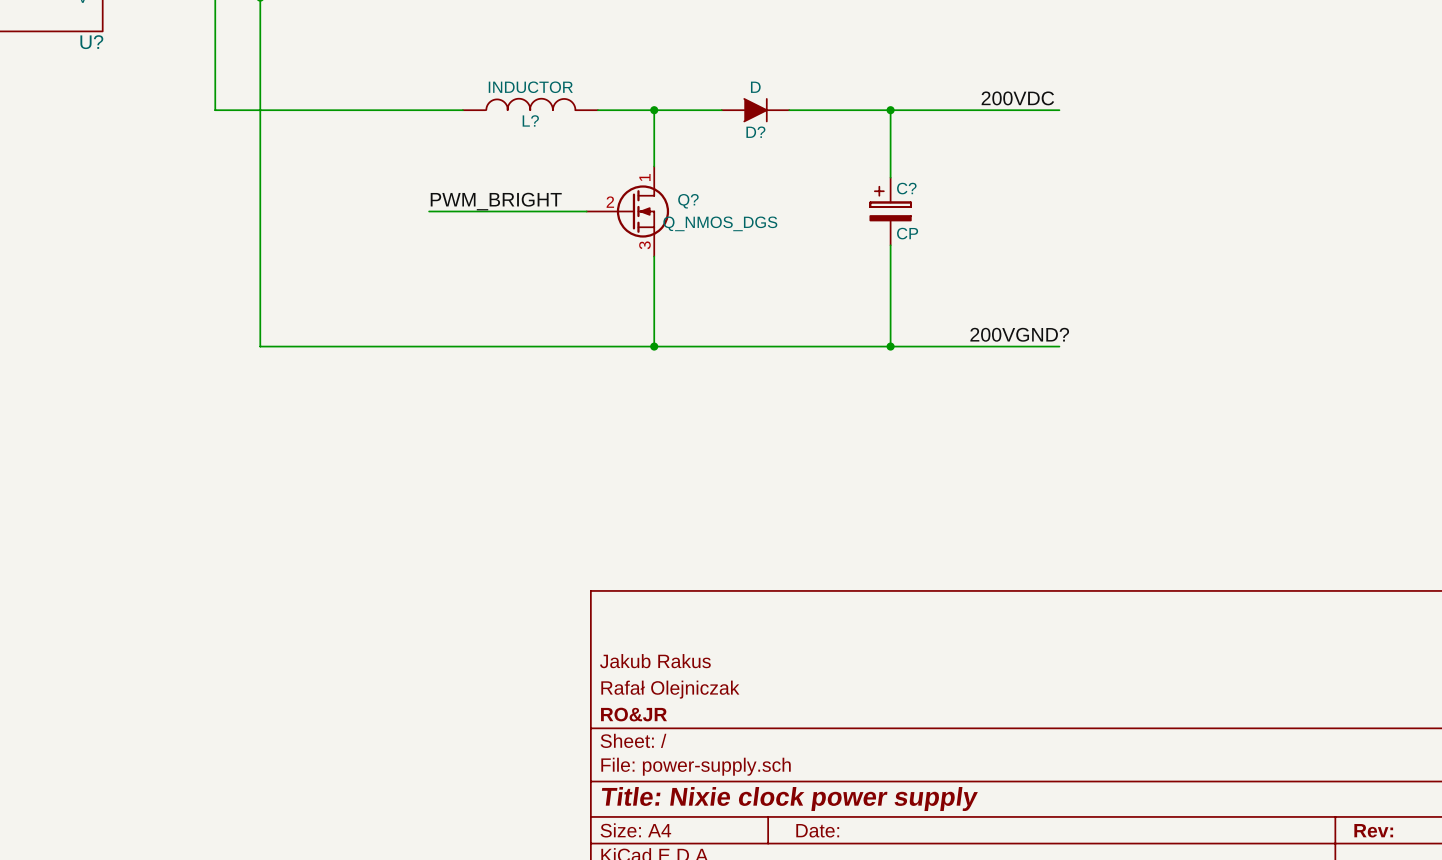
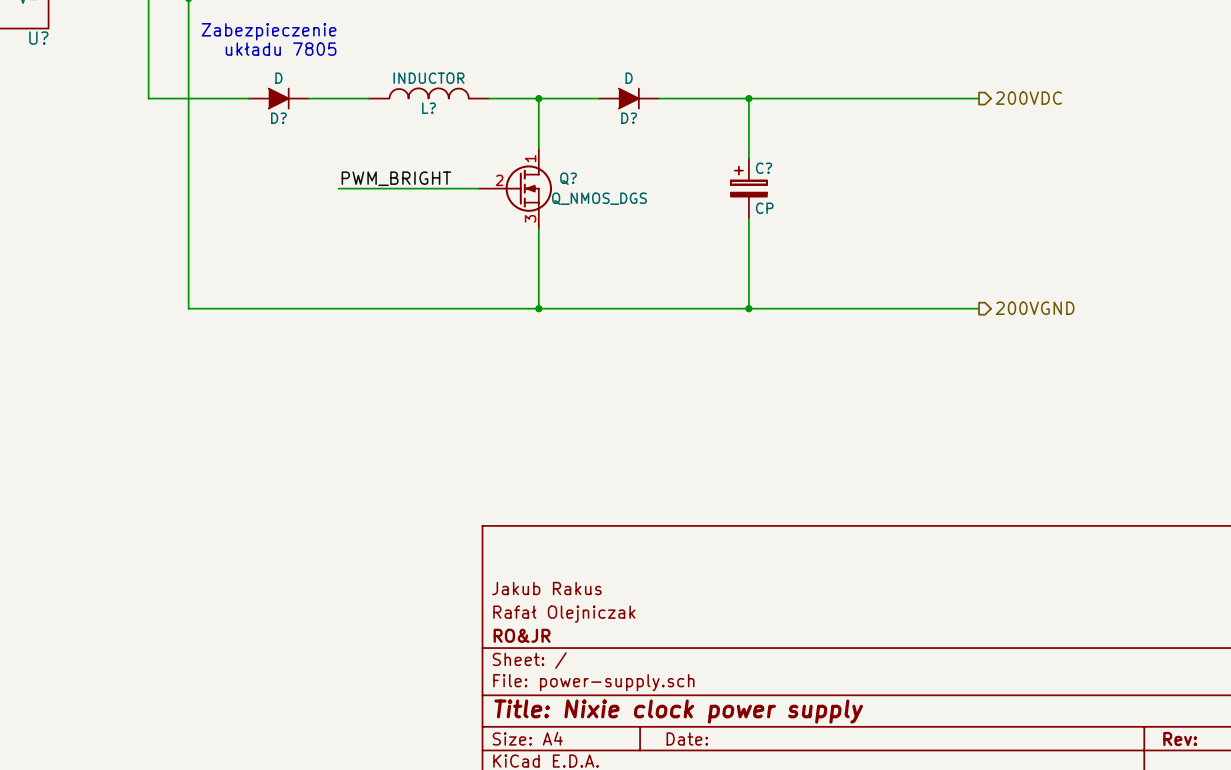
text: none -> Zabezpieczenie (269, 31)
text: none -> układu 7805 (281, 49)
label: 200VDC (1017, 98) -> none
hierarchical label: none -> 200VDC (1028, 98)
D?: none -> D (278, 98)
wire: none -> (899, 98) (979, 98)
label: 200VGND? (1019, 334) -> none
wire: none -> (899, 308) (979, 308)
hierarchical label: none -> 200VGND (1035, 308)

